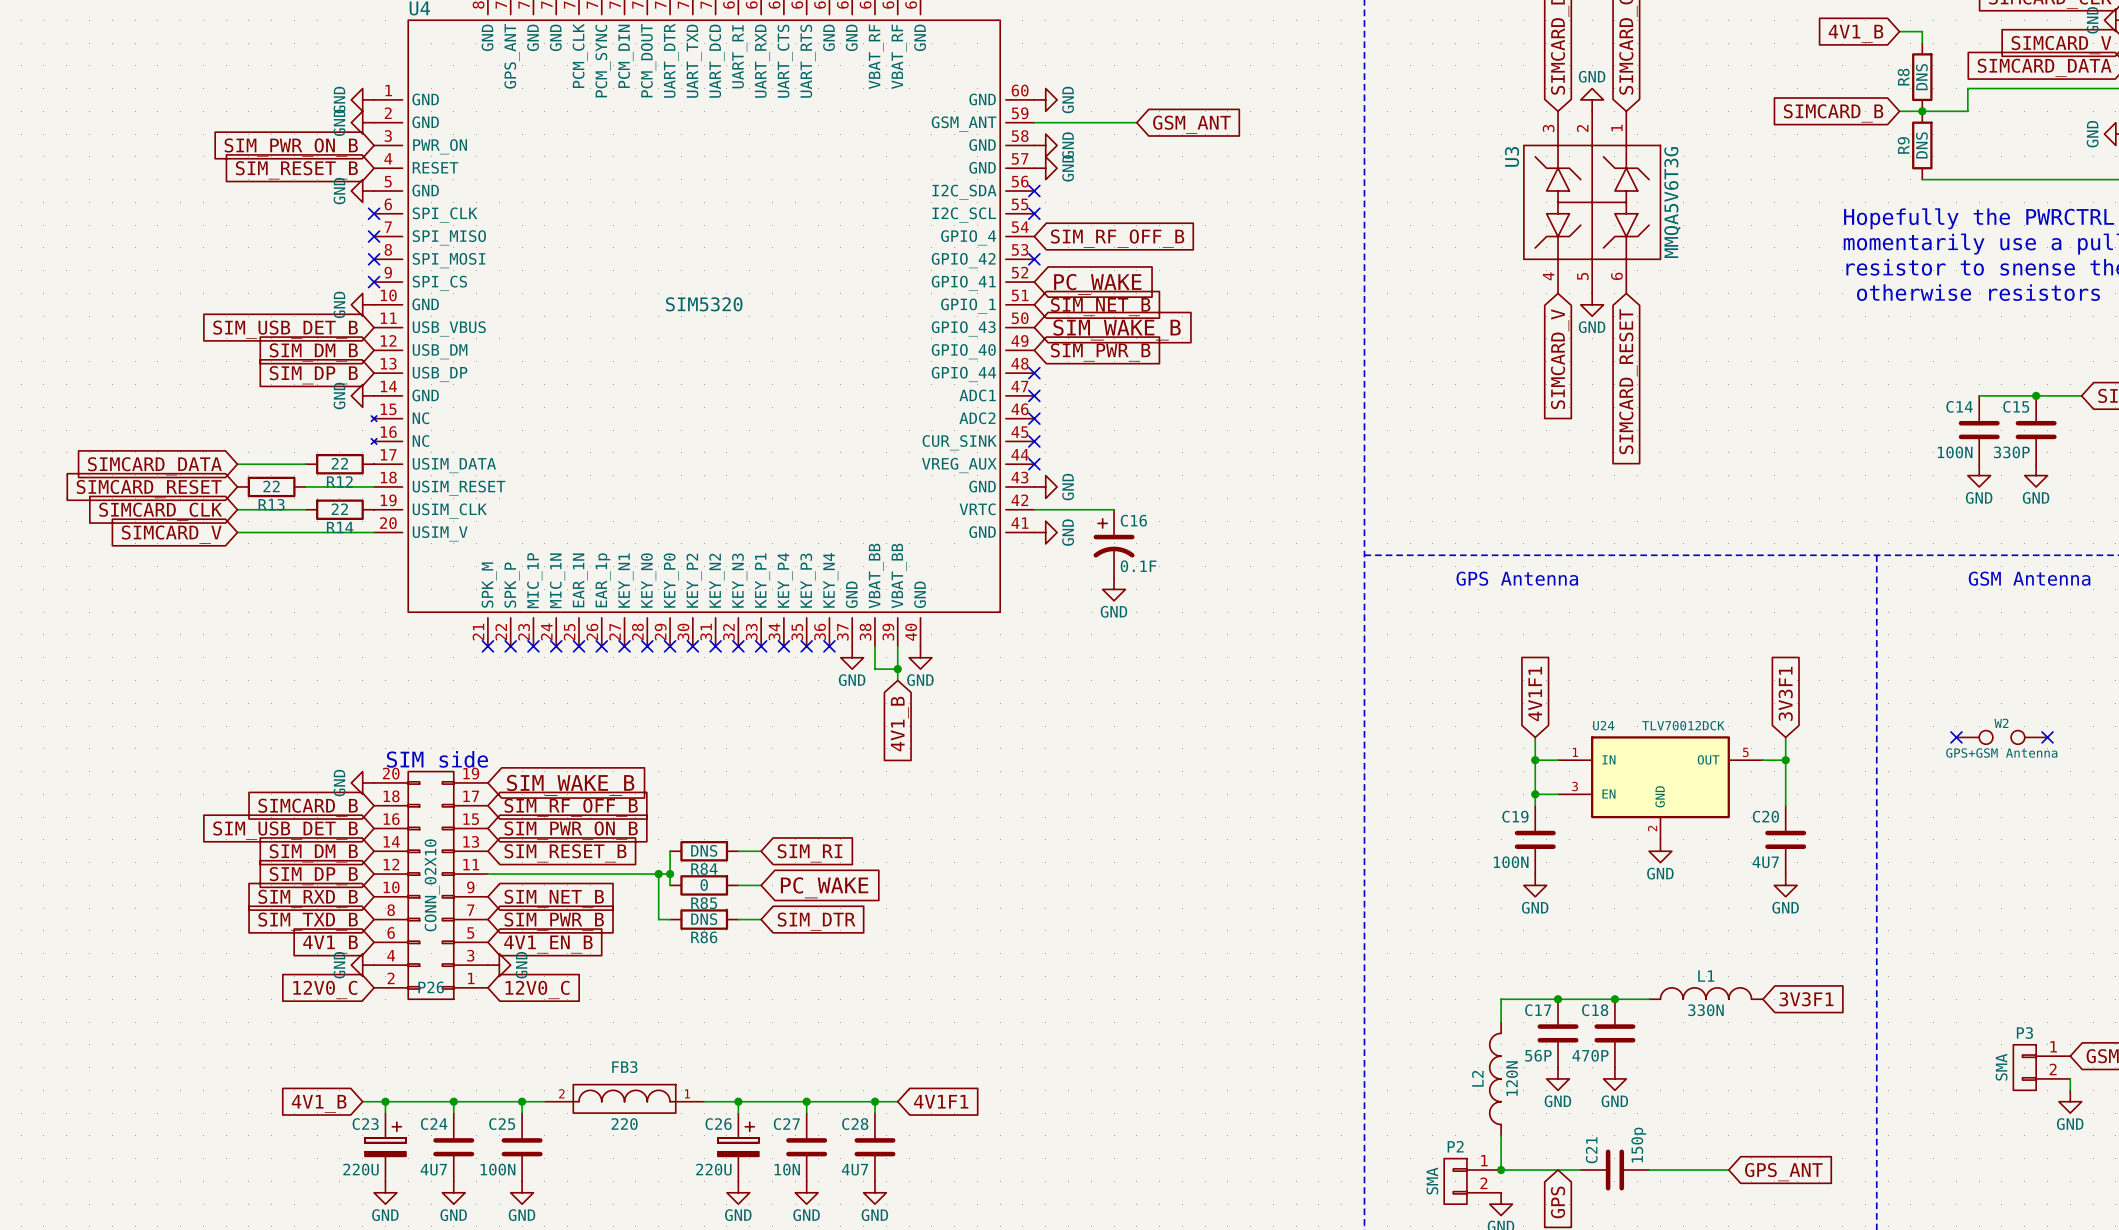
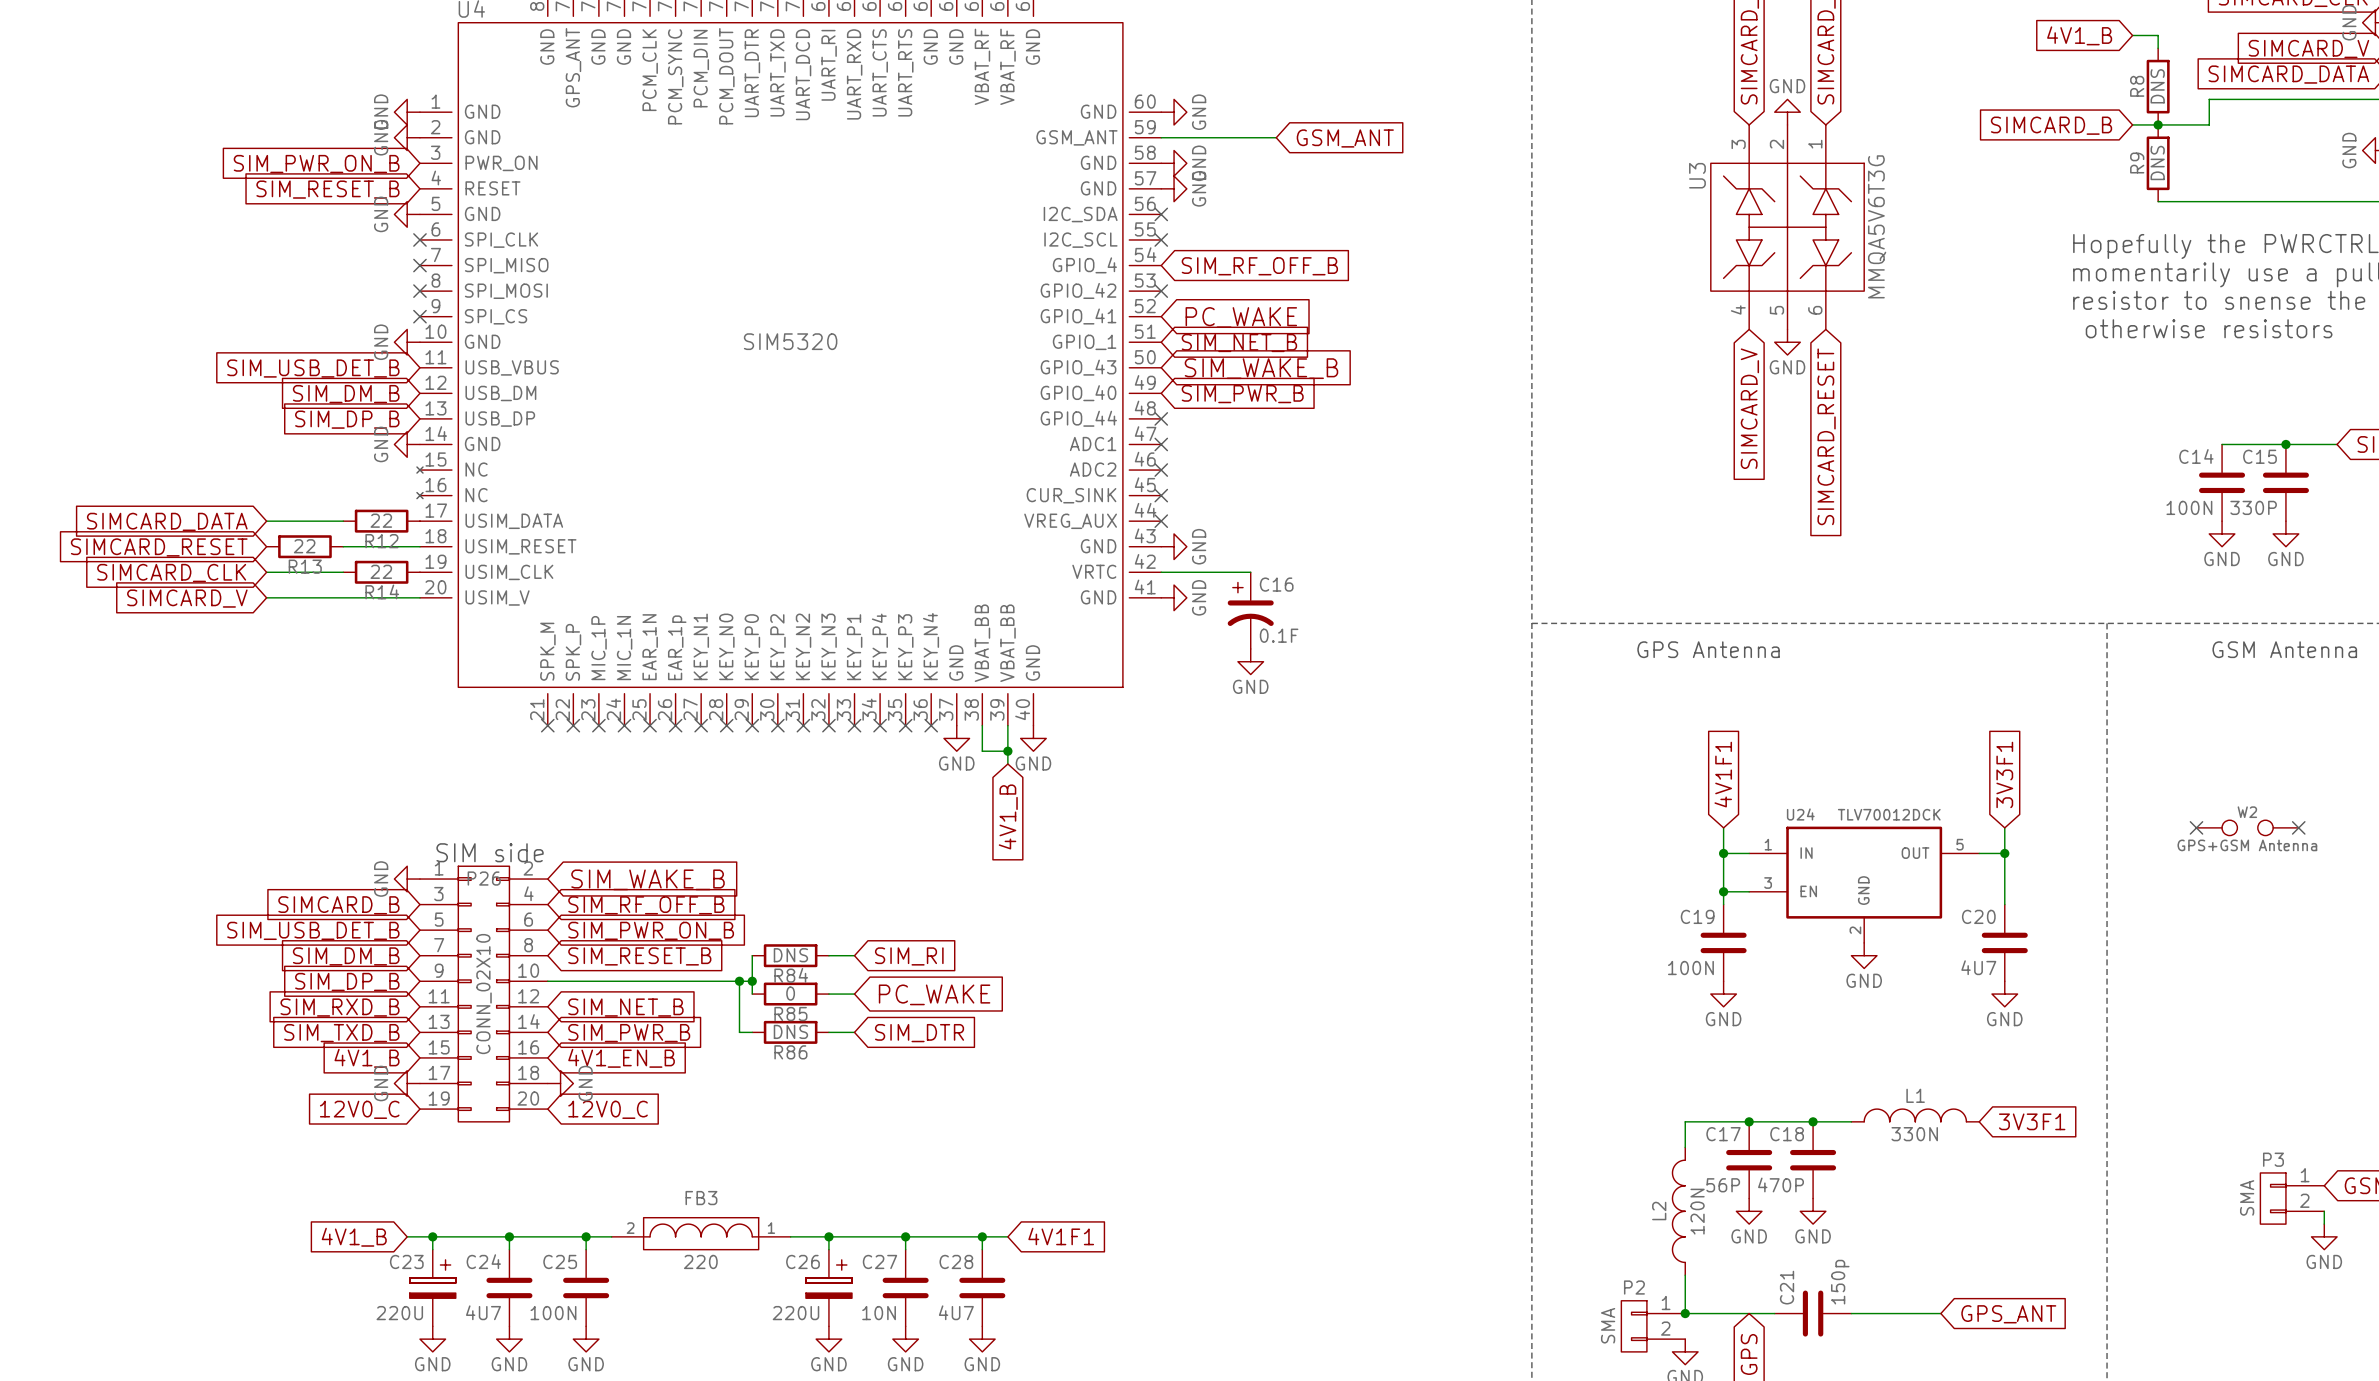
P26 rotation: 0° (431, 885) -> 180° (483, 994)

